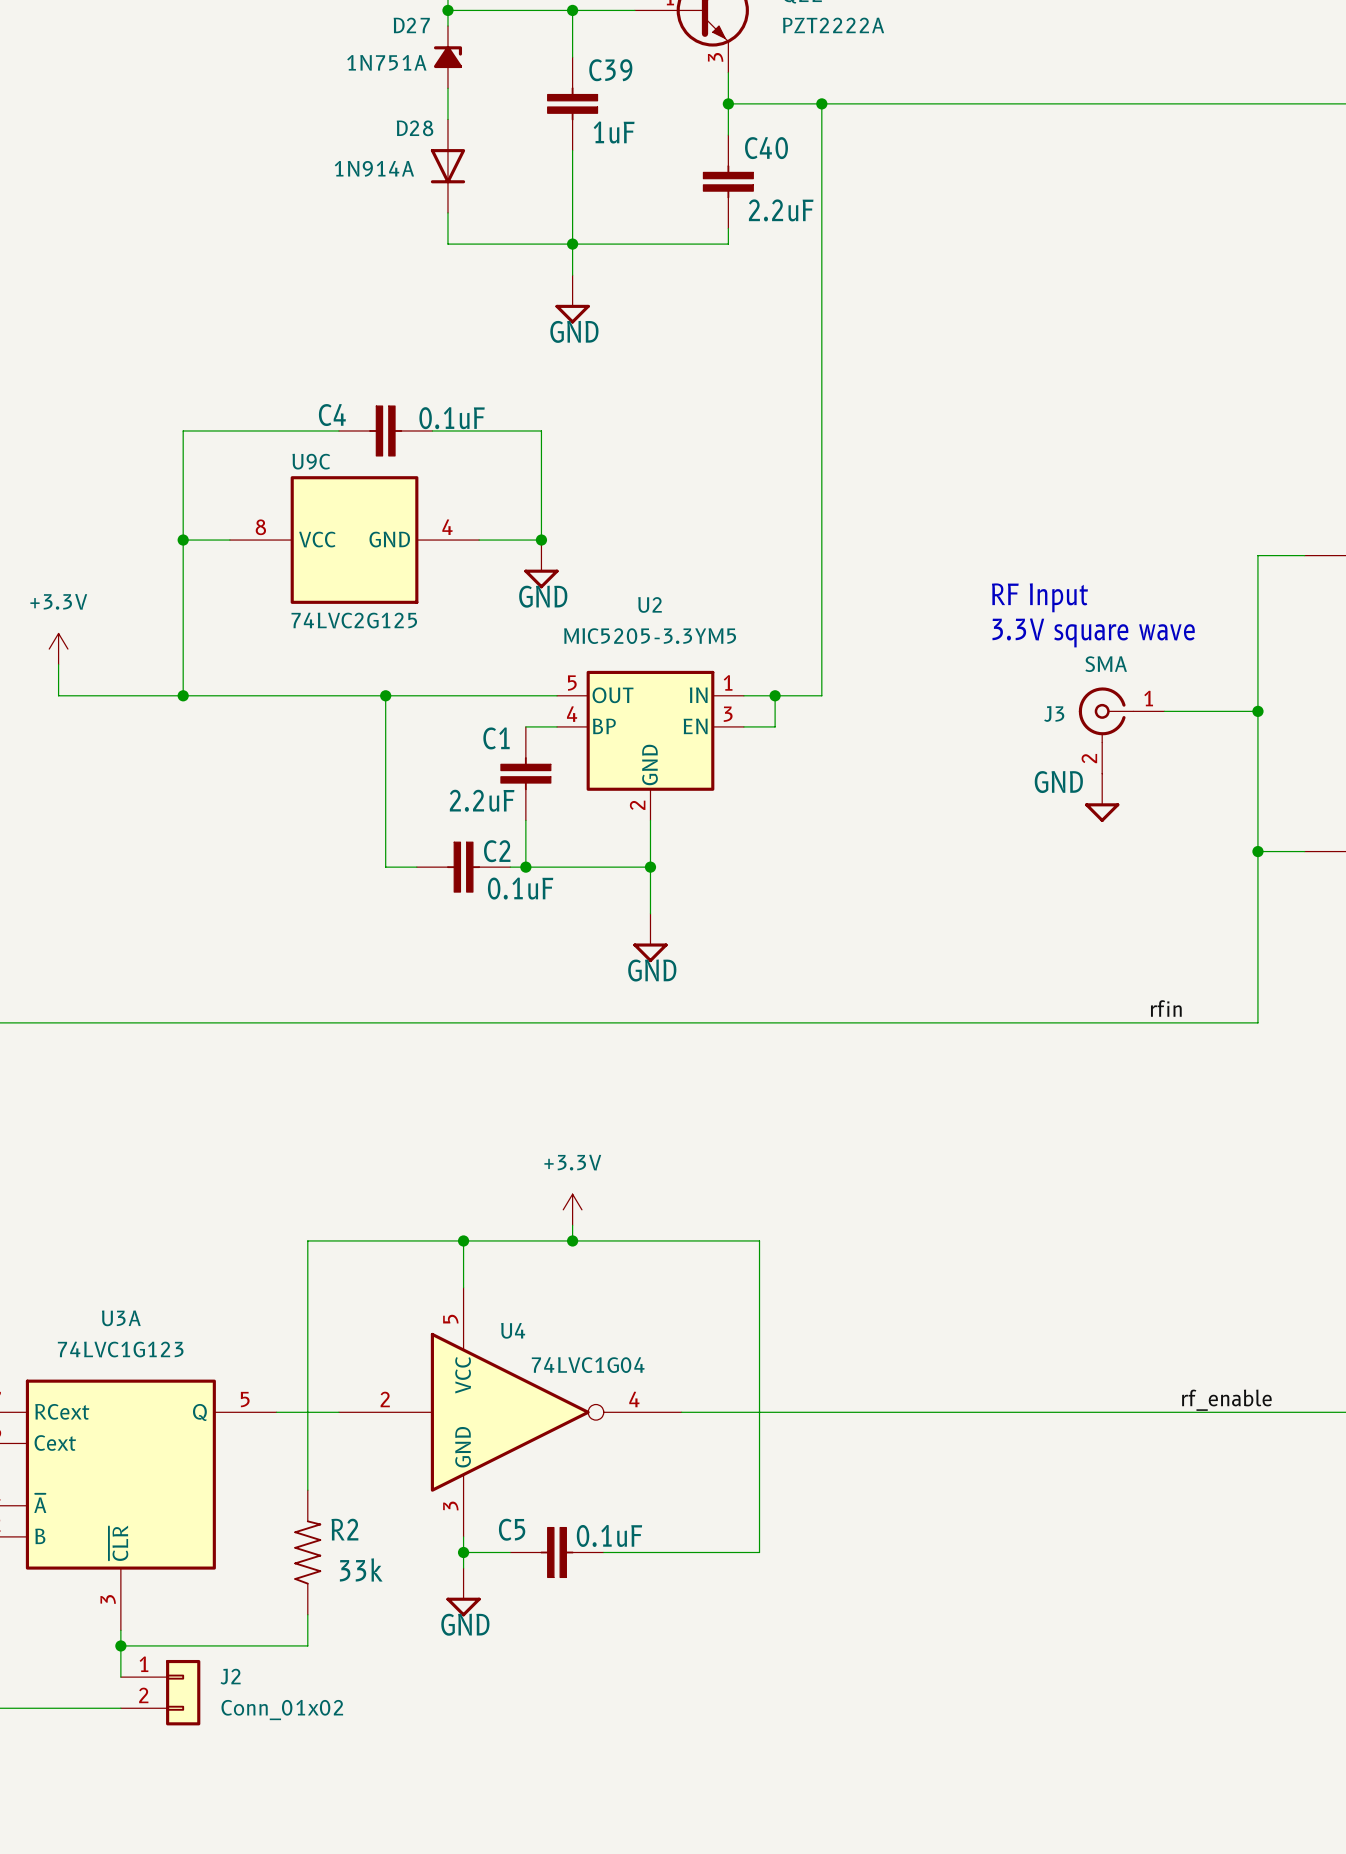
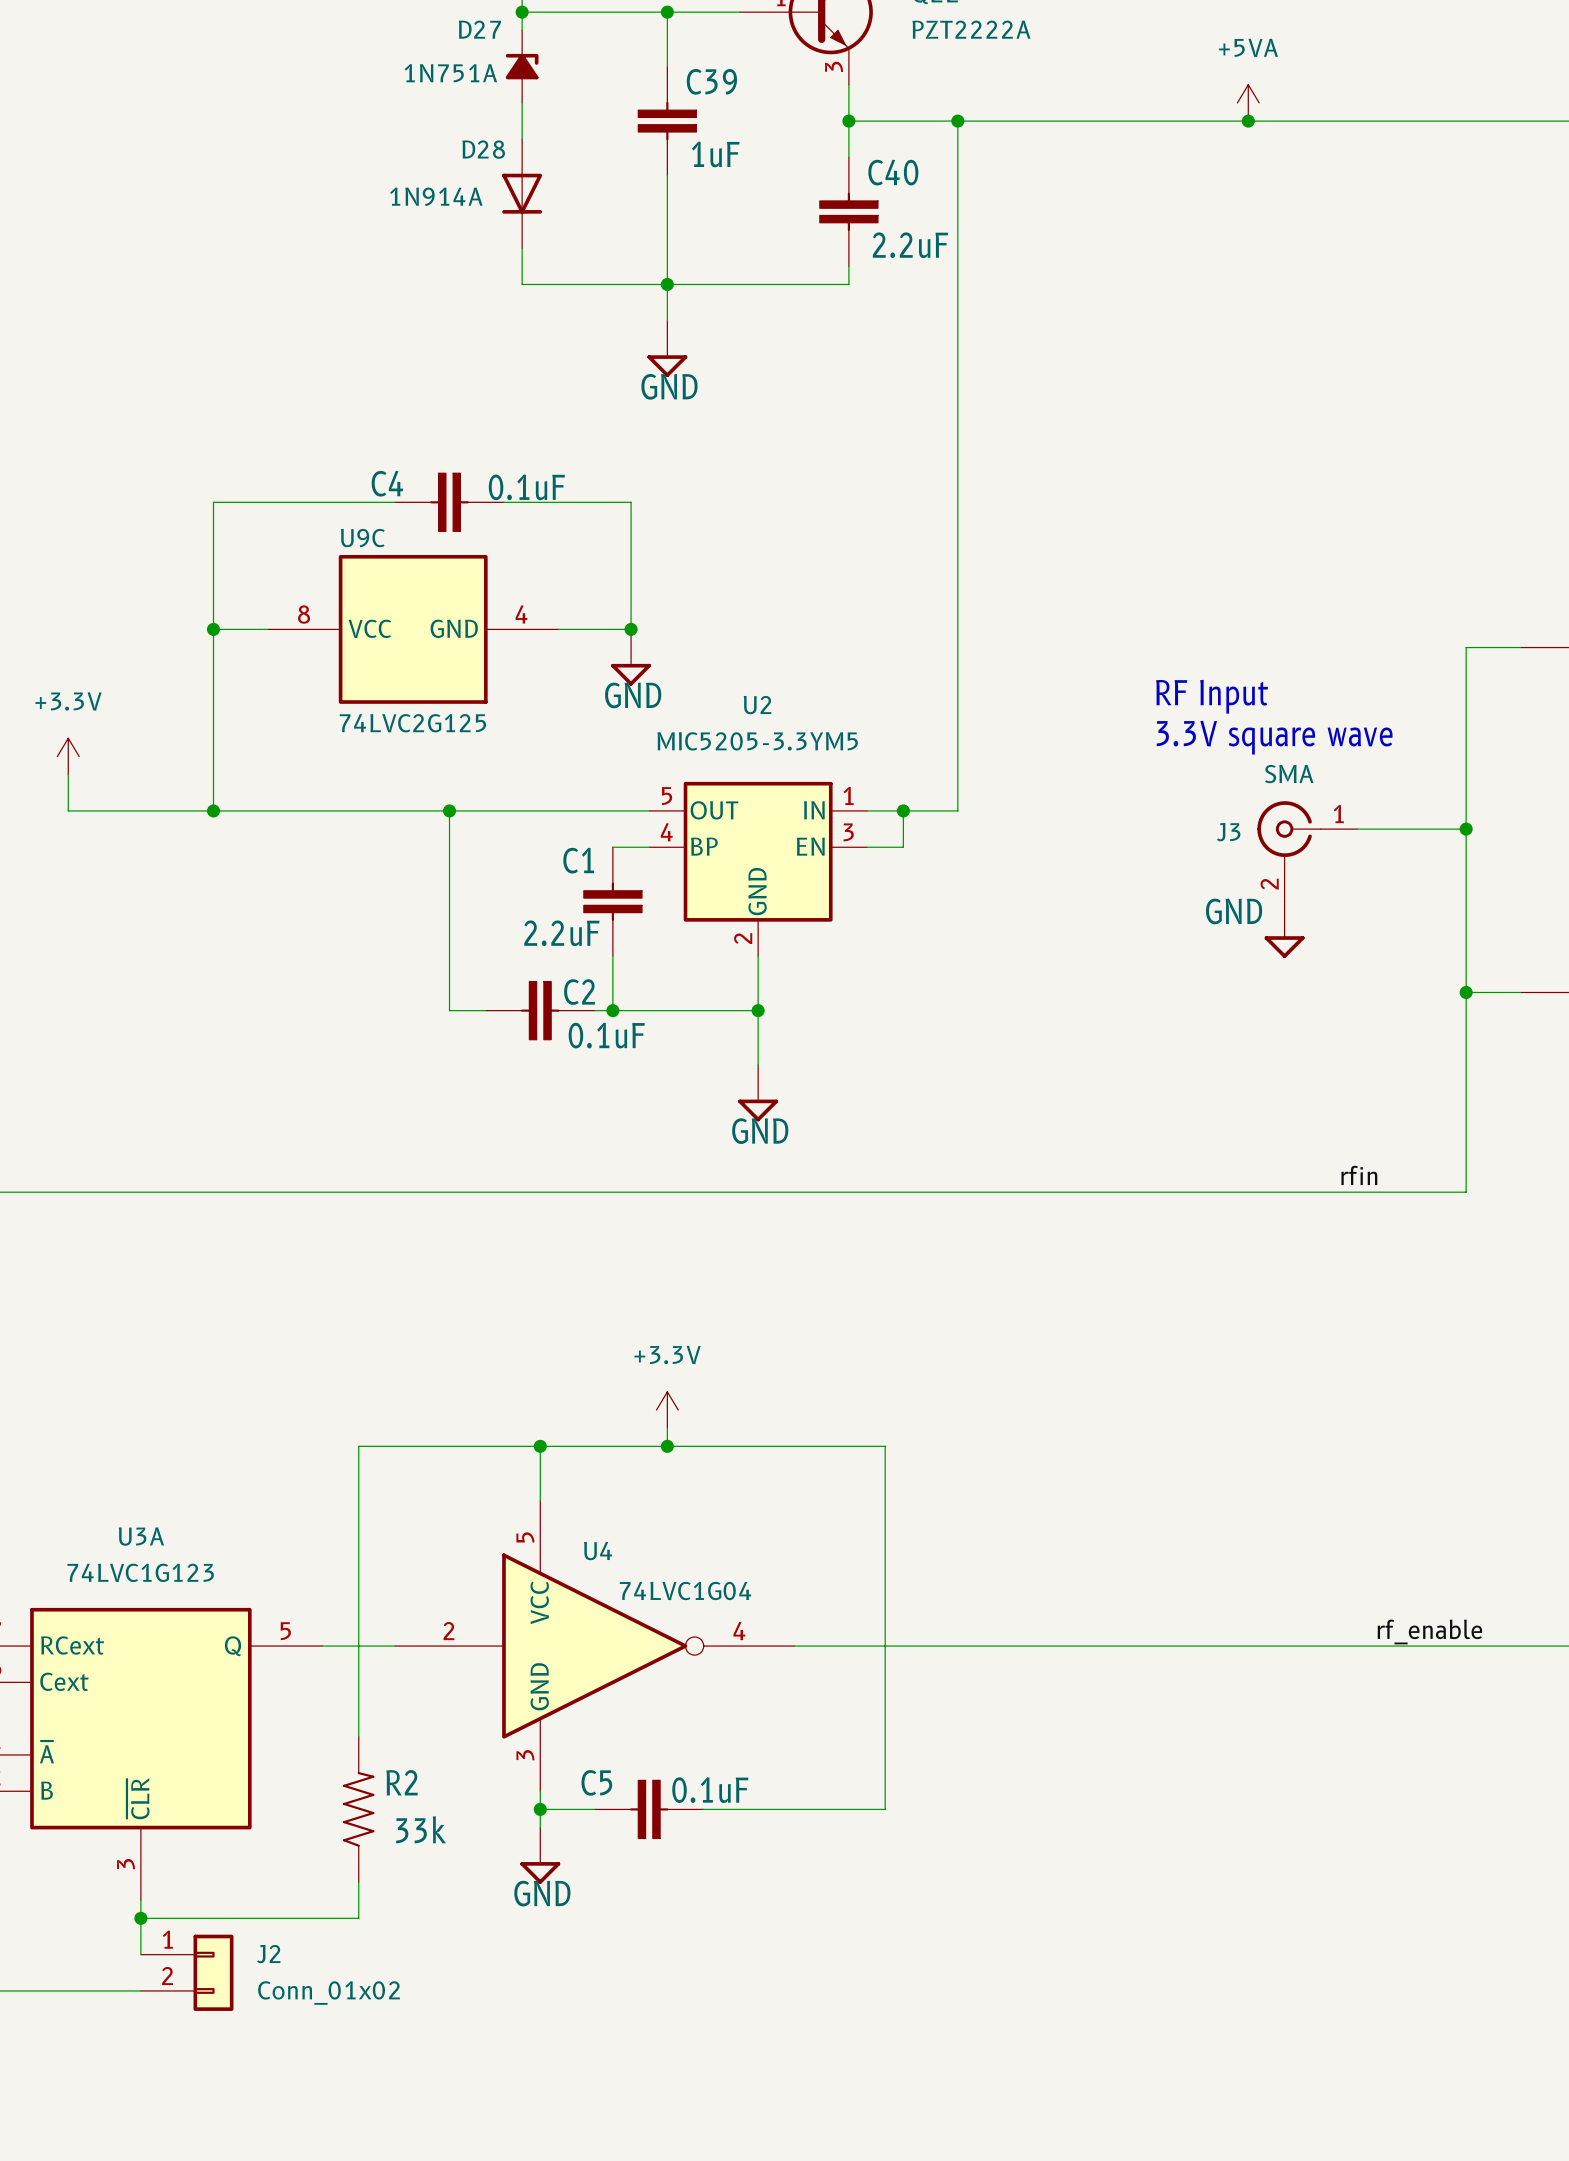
power symbol: none -> +5VA (1248, 102)
junction: none -> (1248, 121)

